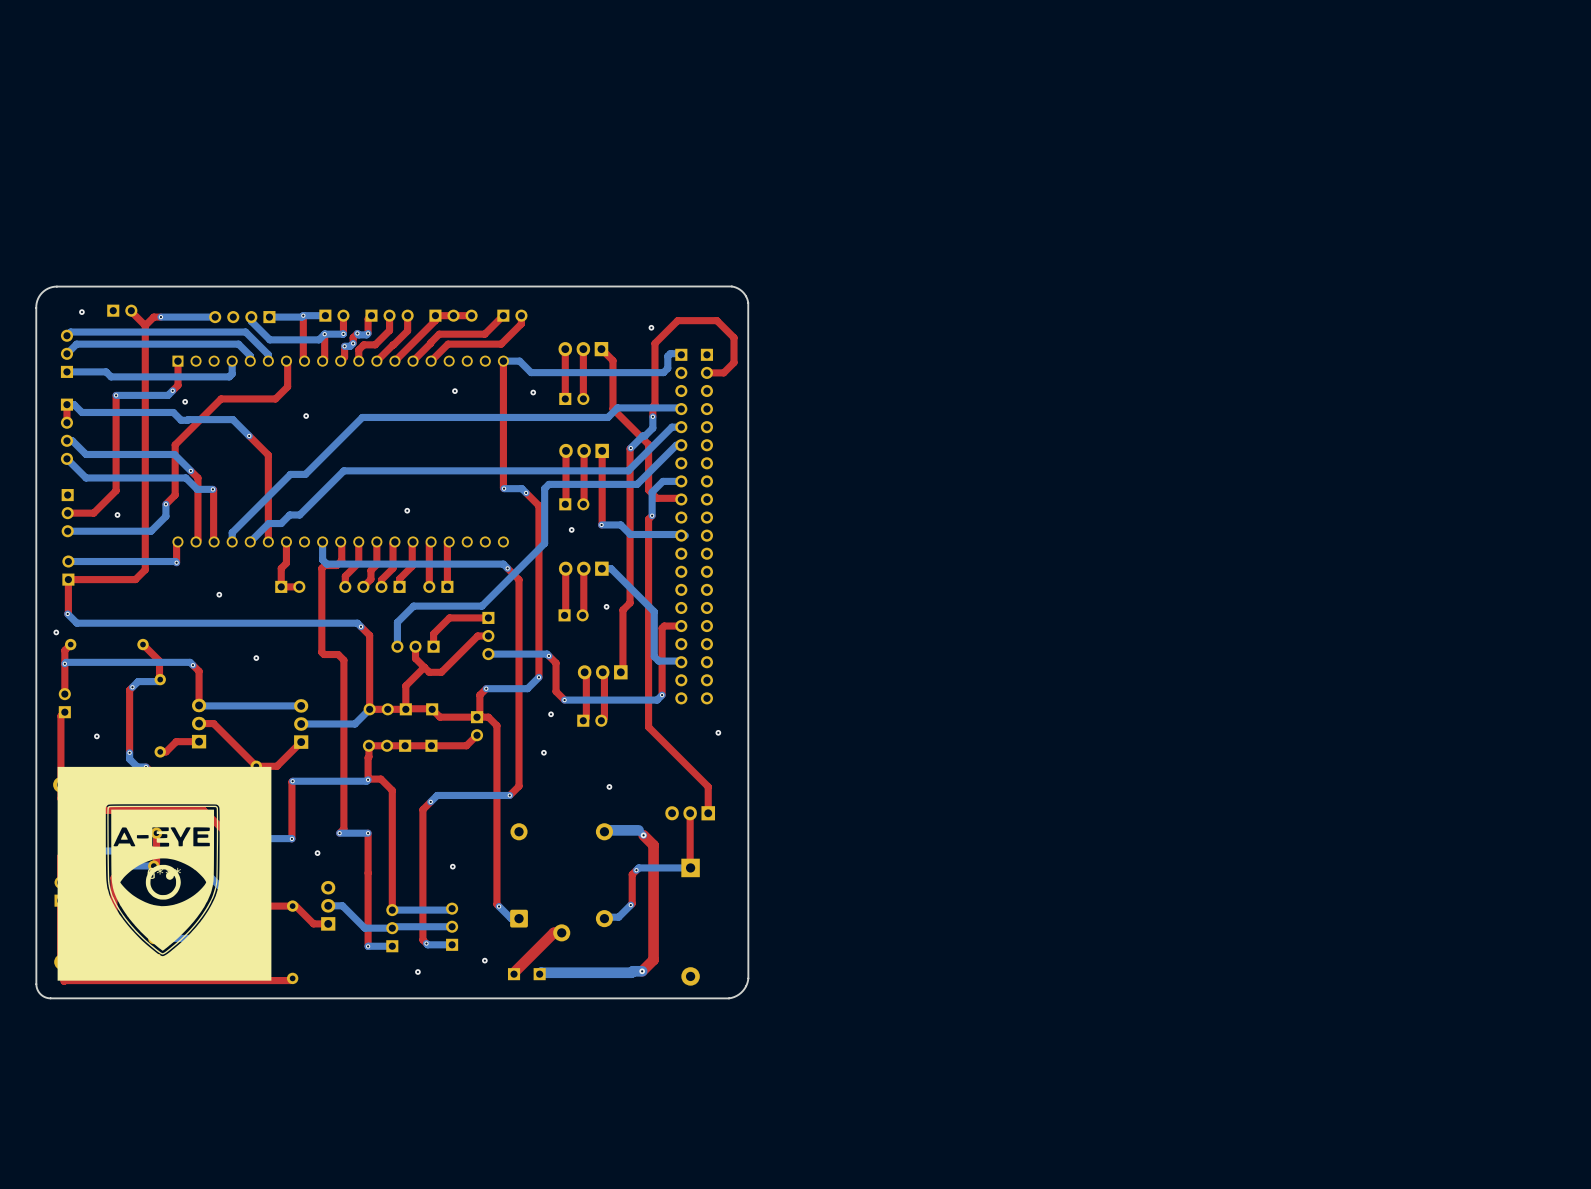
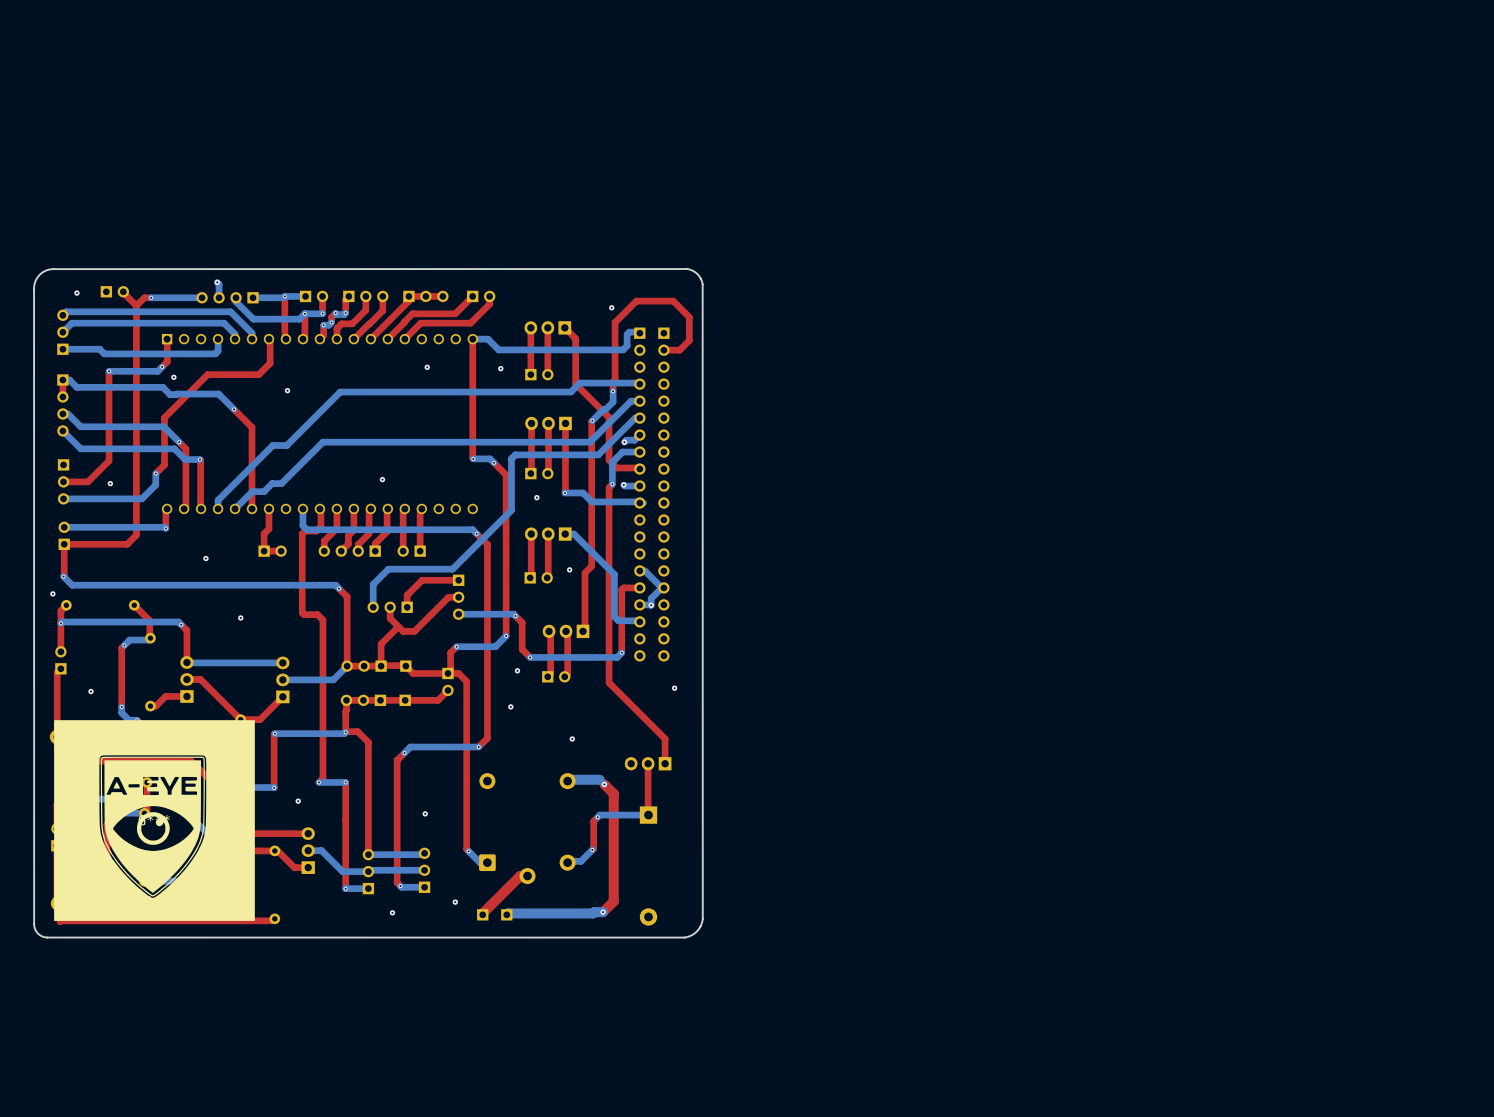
bottom track: none -> (217, 282) (219, 284) (219, 297)
via: none -> (217, 282)
bottom track: none -> (639, 435) (634, 440) (626, 440) (624, 442)
via: none -> (624, 442)
bottom track: none -> (623, 484) (639, 486)
via: none -> (623, 484)
bottom track: none -> (639, 570) (644, 570) (661, 587)
bottom track: none -> (661, 587) (651, 598) (651, 605) (639, 604)
via: none -> (651, 605)
top track: none -> (308, 833) (224, 833)

